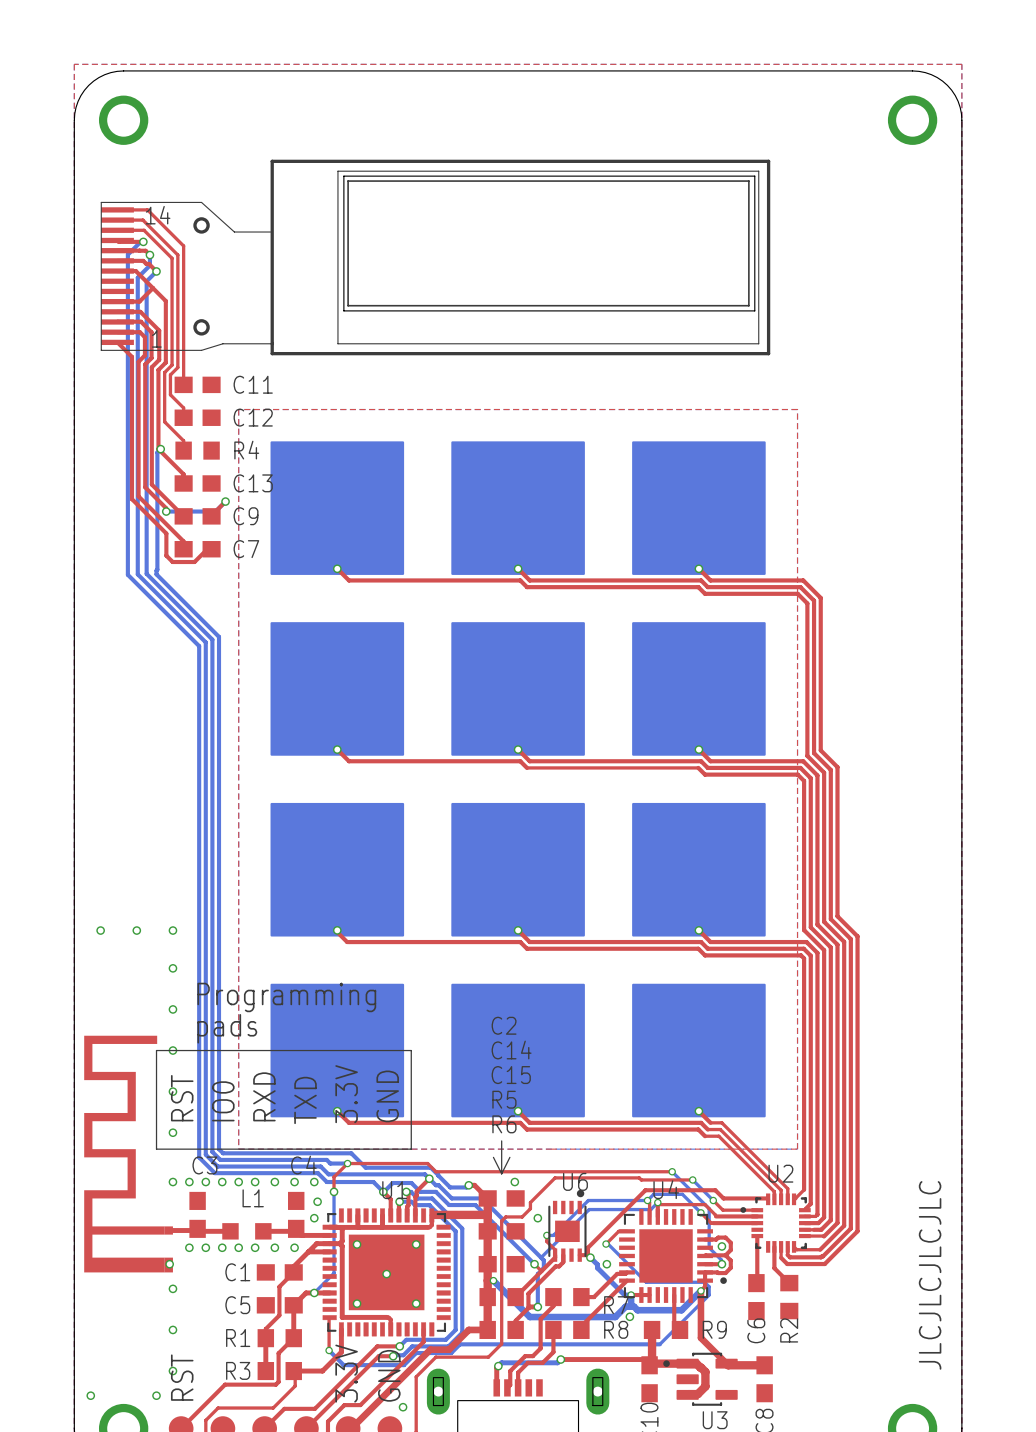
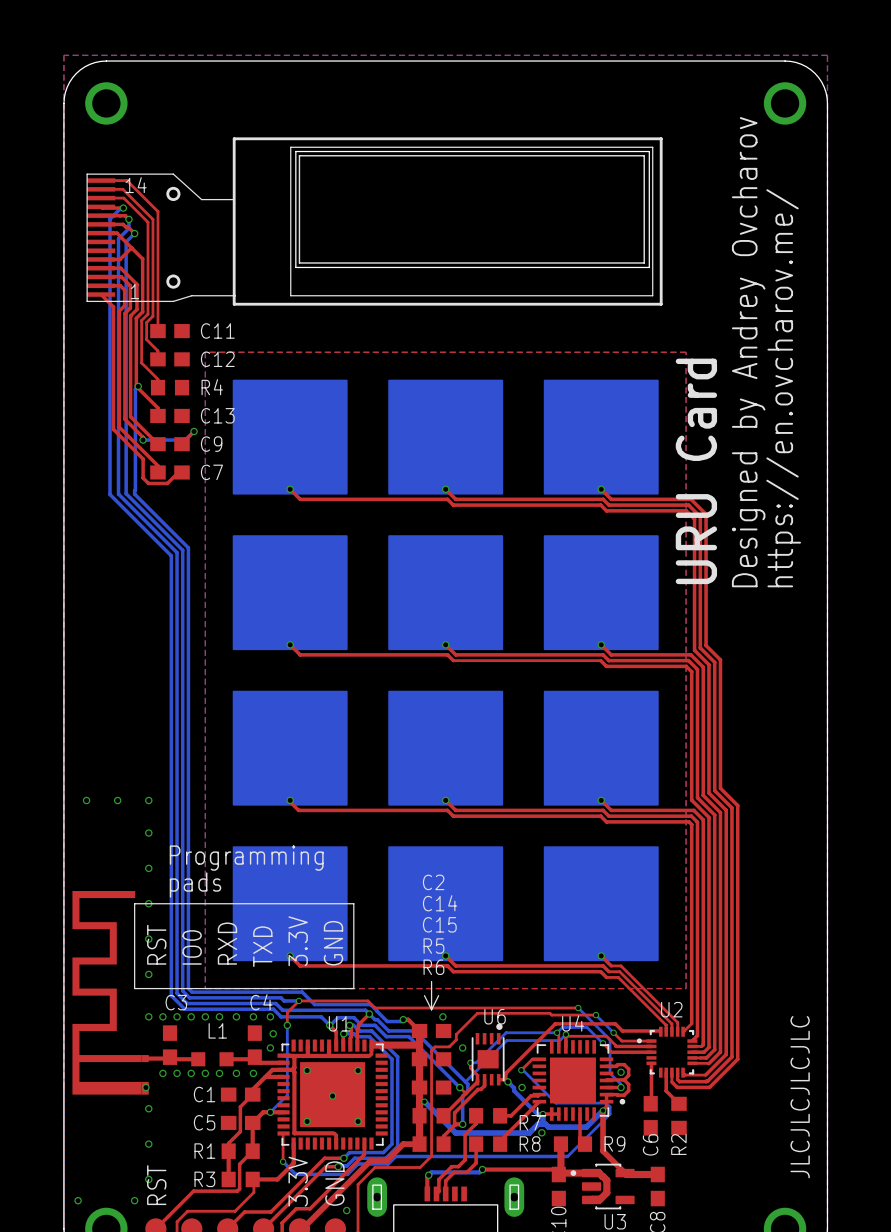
text: none -> Designed by Andrey Ovcharov (748, 352)
text: none -> https://en.ovcharov.me/ (783, 388)
text: none -> URU Card (696, 471)

